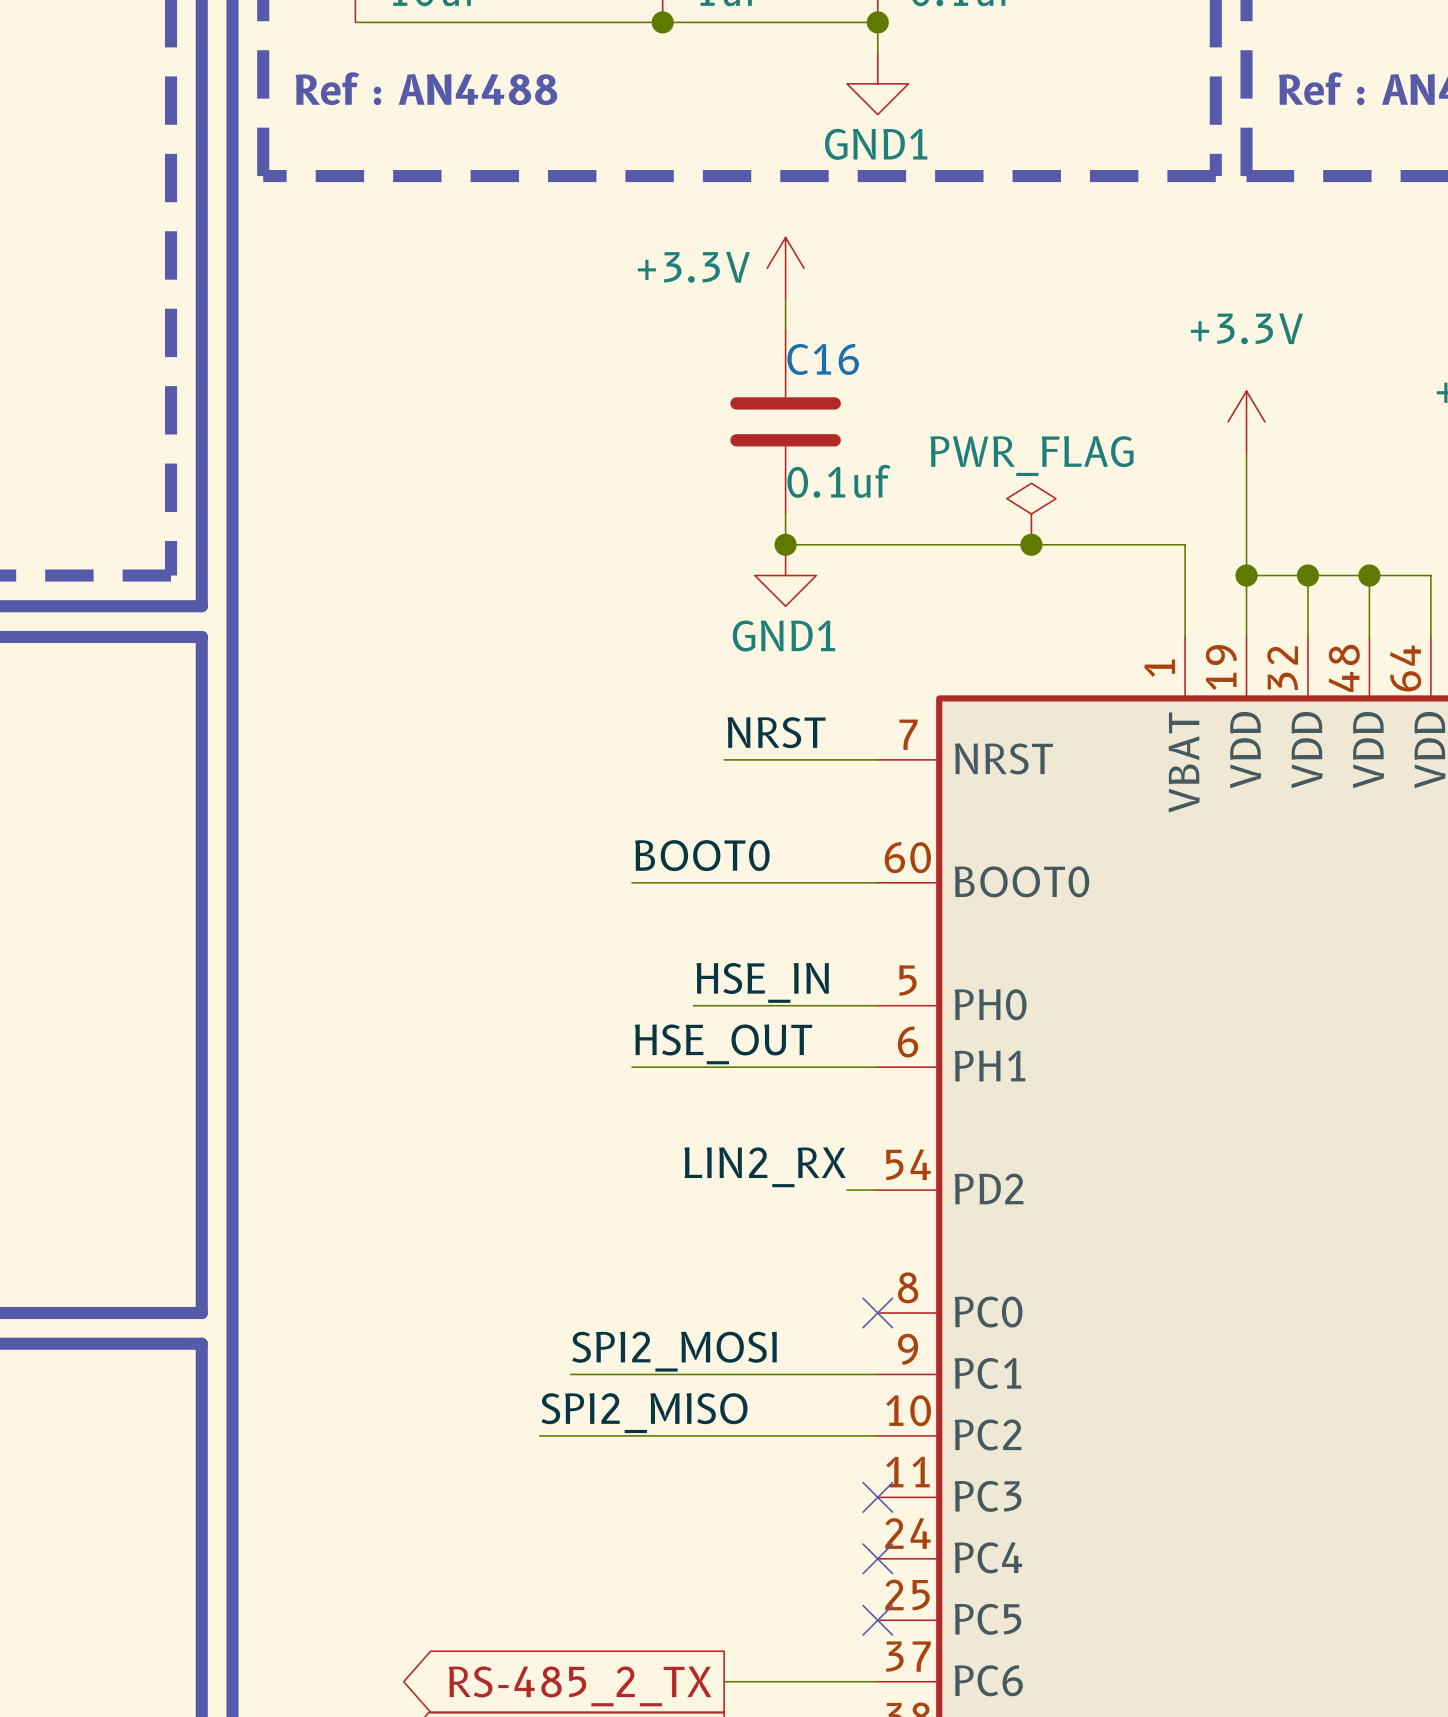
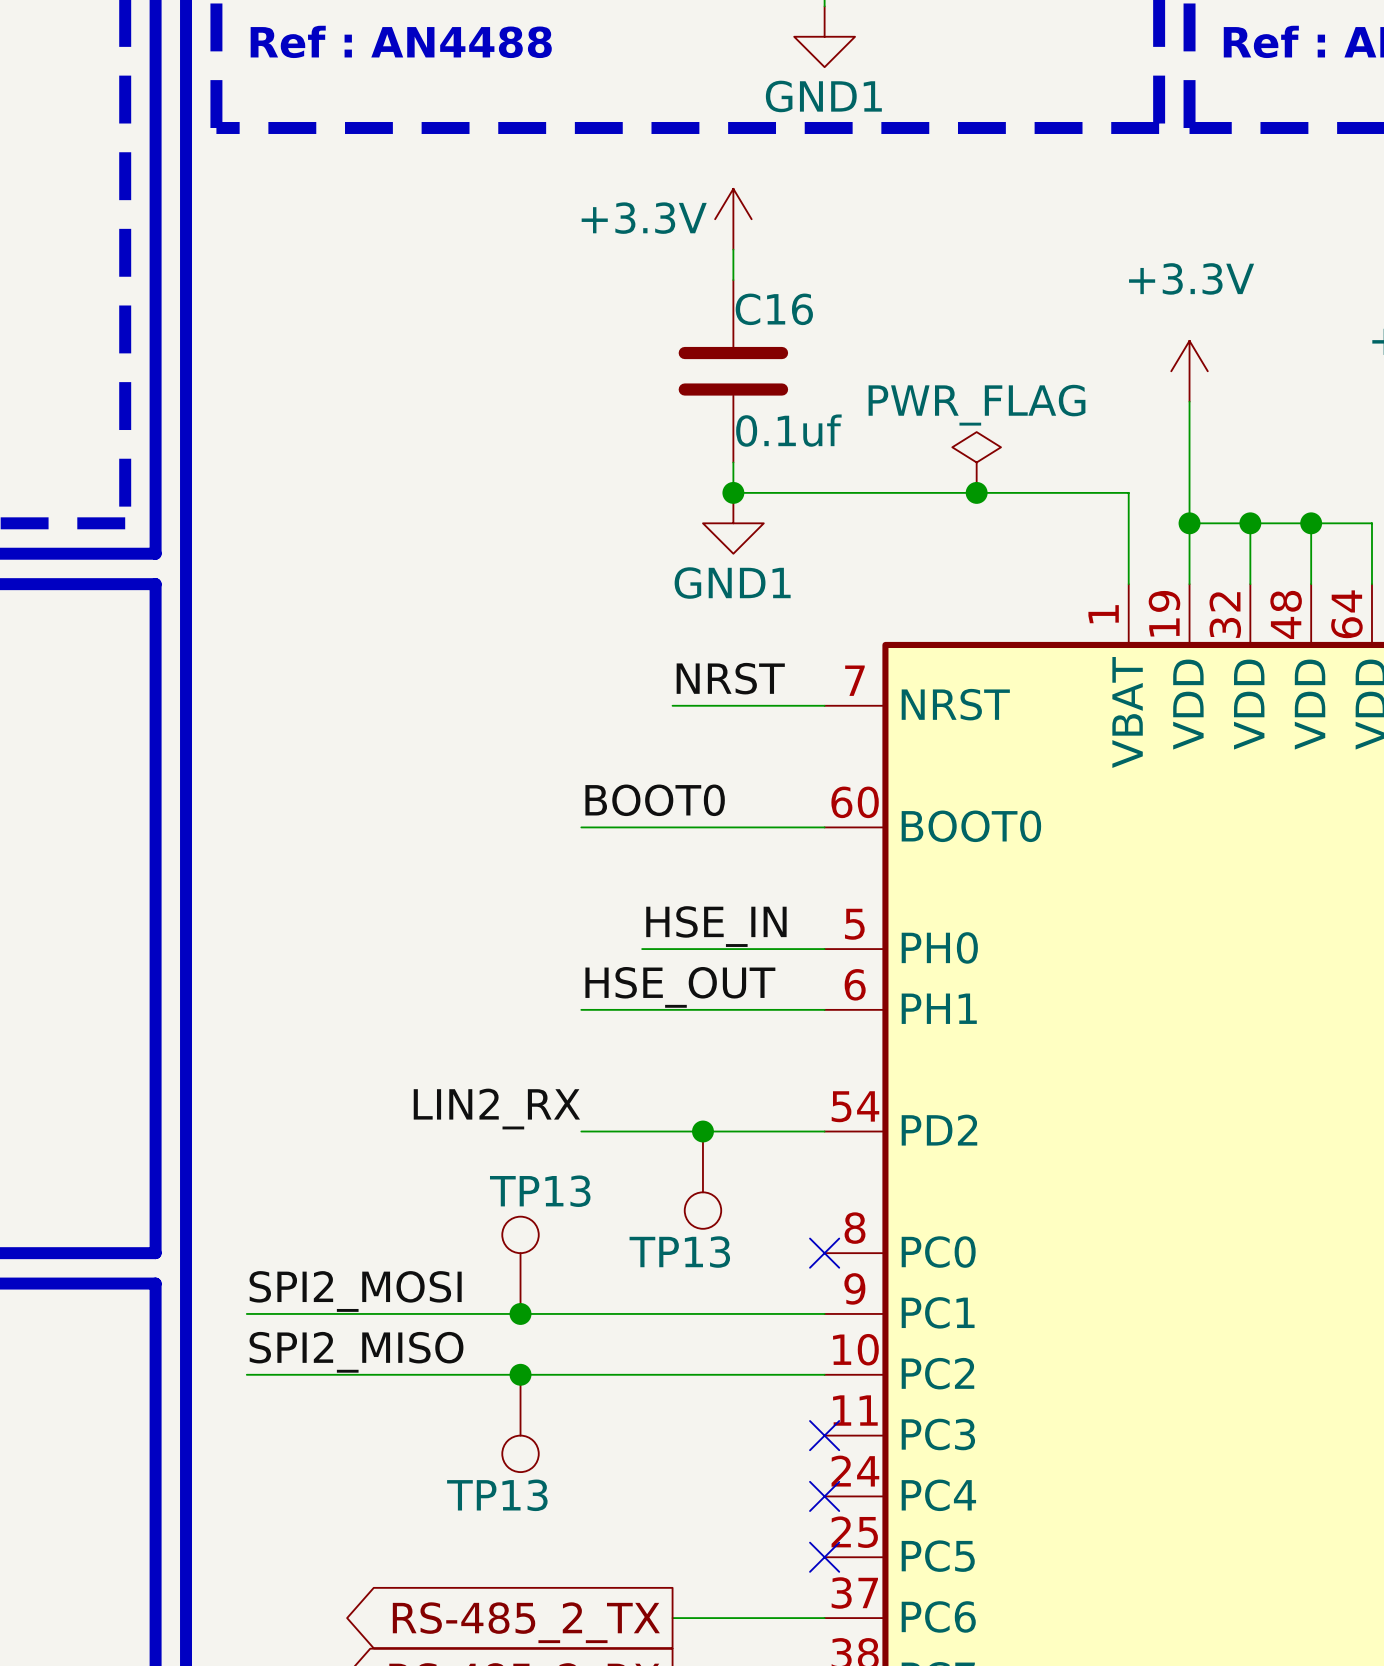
label position: LIN2_RX (765, 1167) -> LIN2_RX (496, 1109)
wire: none -> (581, 1131) (794, 1131)
junction: none -> (702, 1131)
TP13: none -> (702, 1180)
TP13: none -> (520, 1265)
label position: SPI2_MOSI (674, 1351) -> SPI2_MOSI (355, 1291)
wire: none -> (246, 1313) (520, 1313)
junction: none -> (520, 1313)
label position: SPI2_MISO (644, 1413) -> SPI2_MISO (356, 1352)
wire: none -> (246, 1374) (490, 1374)
junction: none -> (520, 1374)
TP13: none -> (520, 1423)

